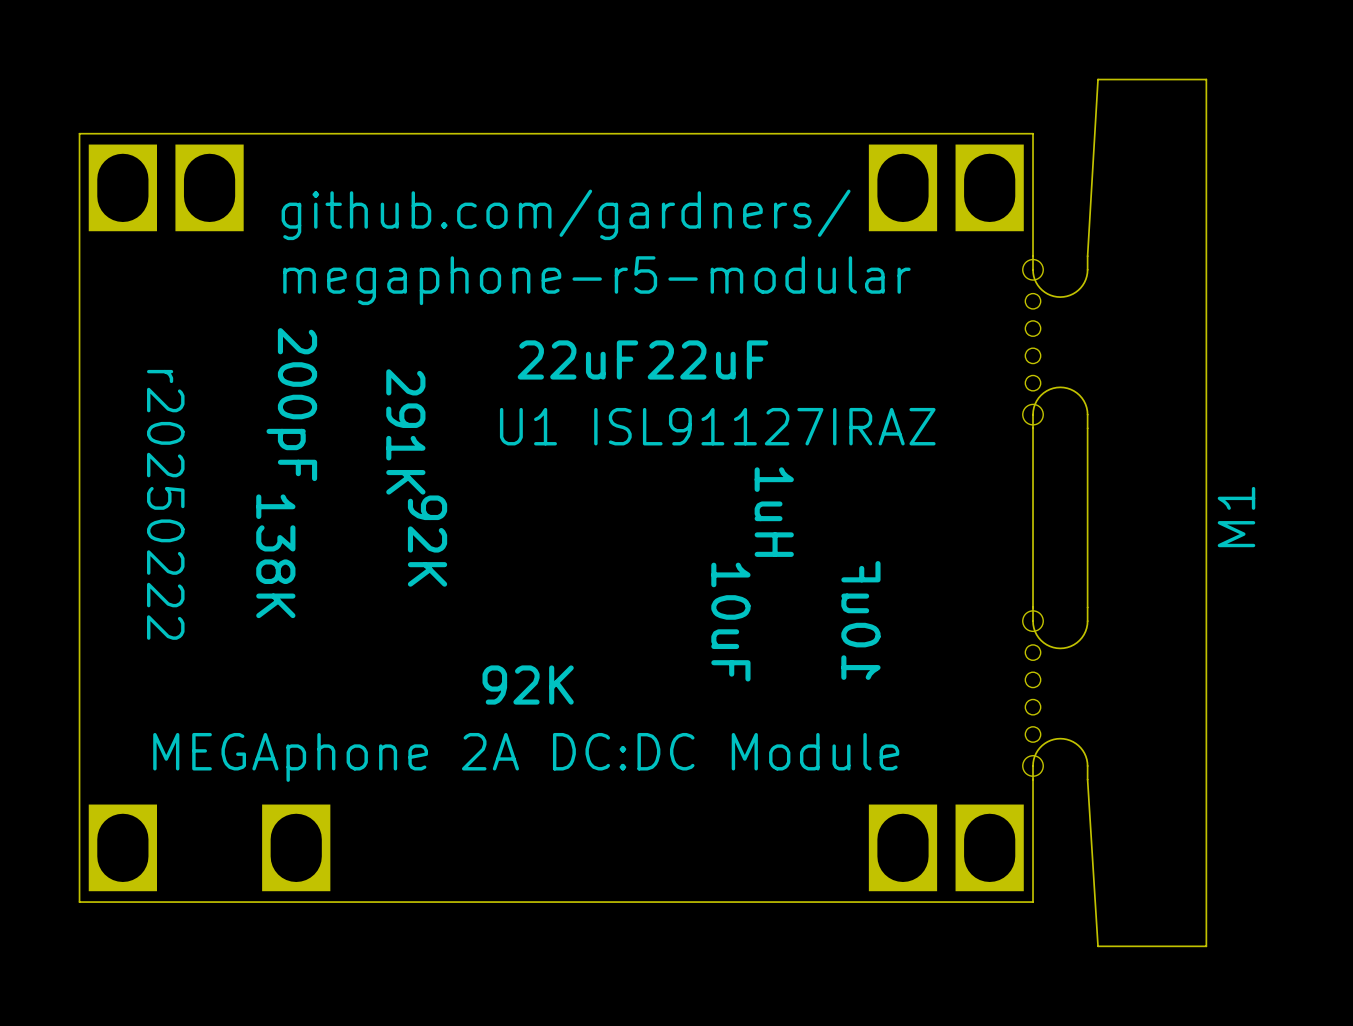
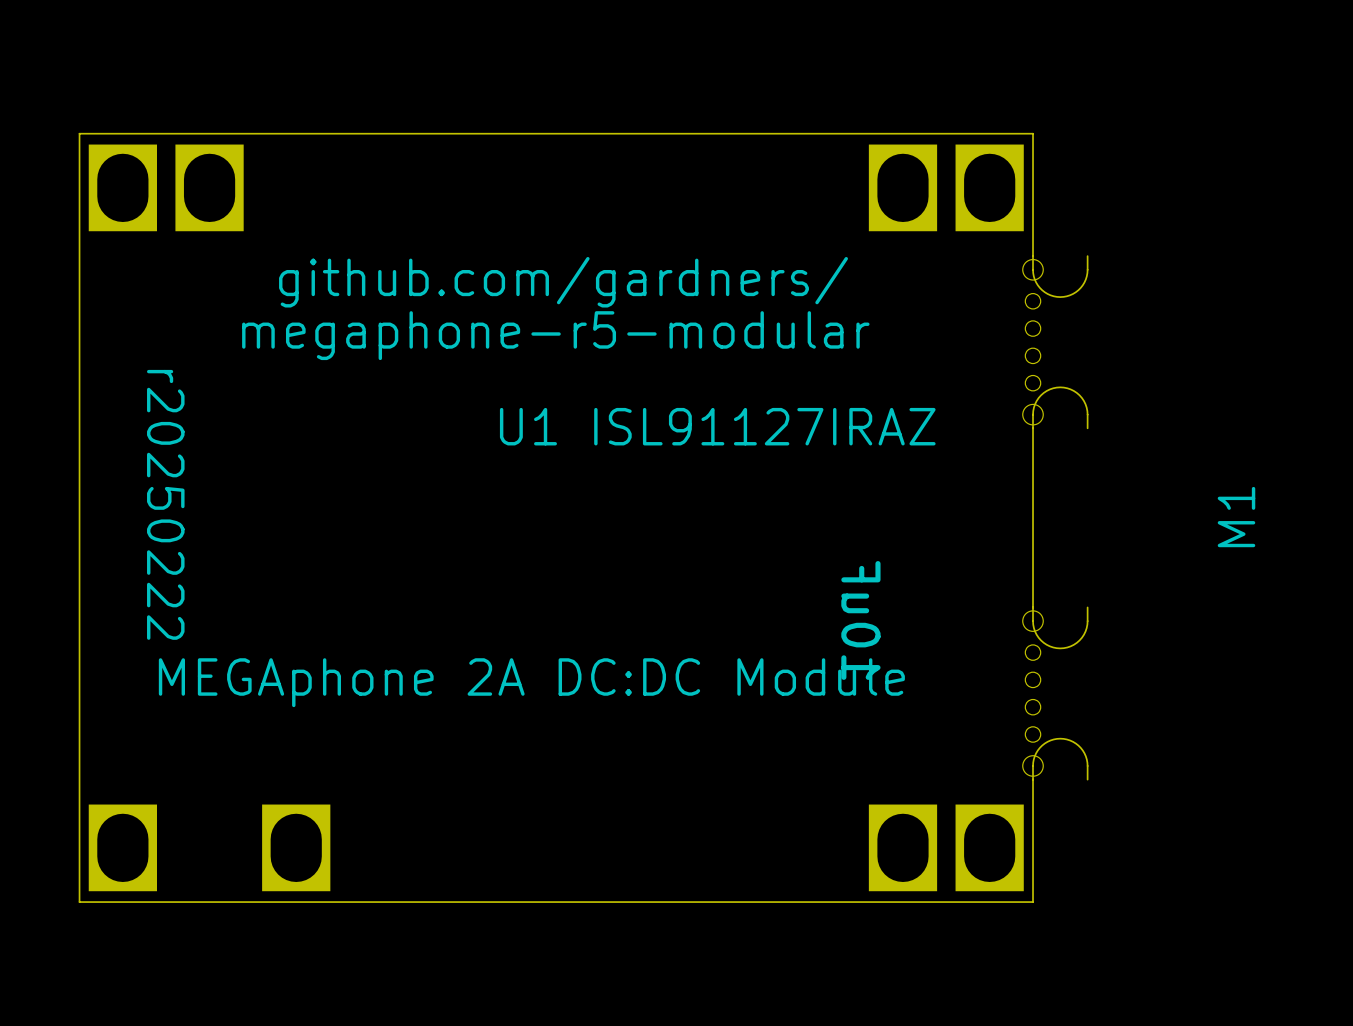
text position: github.com/gardners/ (566, 214) -> github.com/gardners/ (563, 282)
board edge: (1087, 256) (1098, 79) (1206, 79) (1206, 946) (1098, 946) (1087, 779) -> none
text position: megaphone-r5-modular (596, 280) -> megaphone-r5-modular (555, 335)
part: 22uF (577, 359) -> none
part: 22uF (707, 359) -> none
part: 200pF (291, 404) -> none
board edge: (1087, 428) (1087, 607) -> none
part: 291K (405, 431) -> none
part: 1uH (774, 512) -> none
part: 92K (427, 541) -> none
part: 138K (275, 556) -> none
part: 10uF (730, 622) -> none
part: 92K (528, 685) -> none
text position: MEGAphone 2A DC:DC Module (526, 757) -> MEGAphone 2A DC:DC Module (531, 682)

